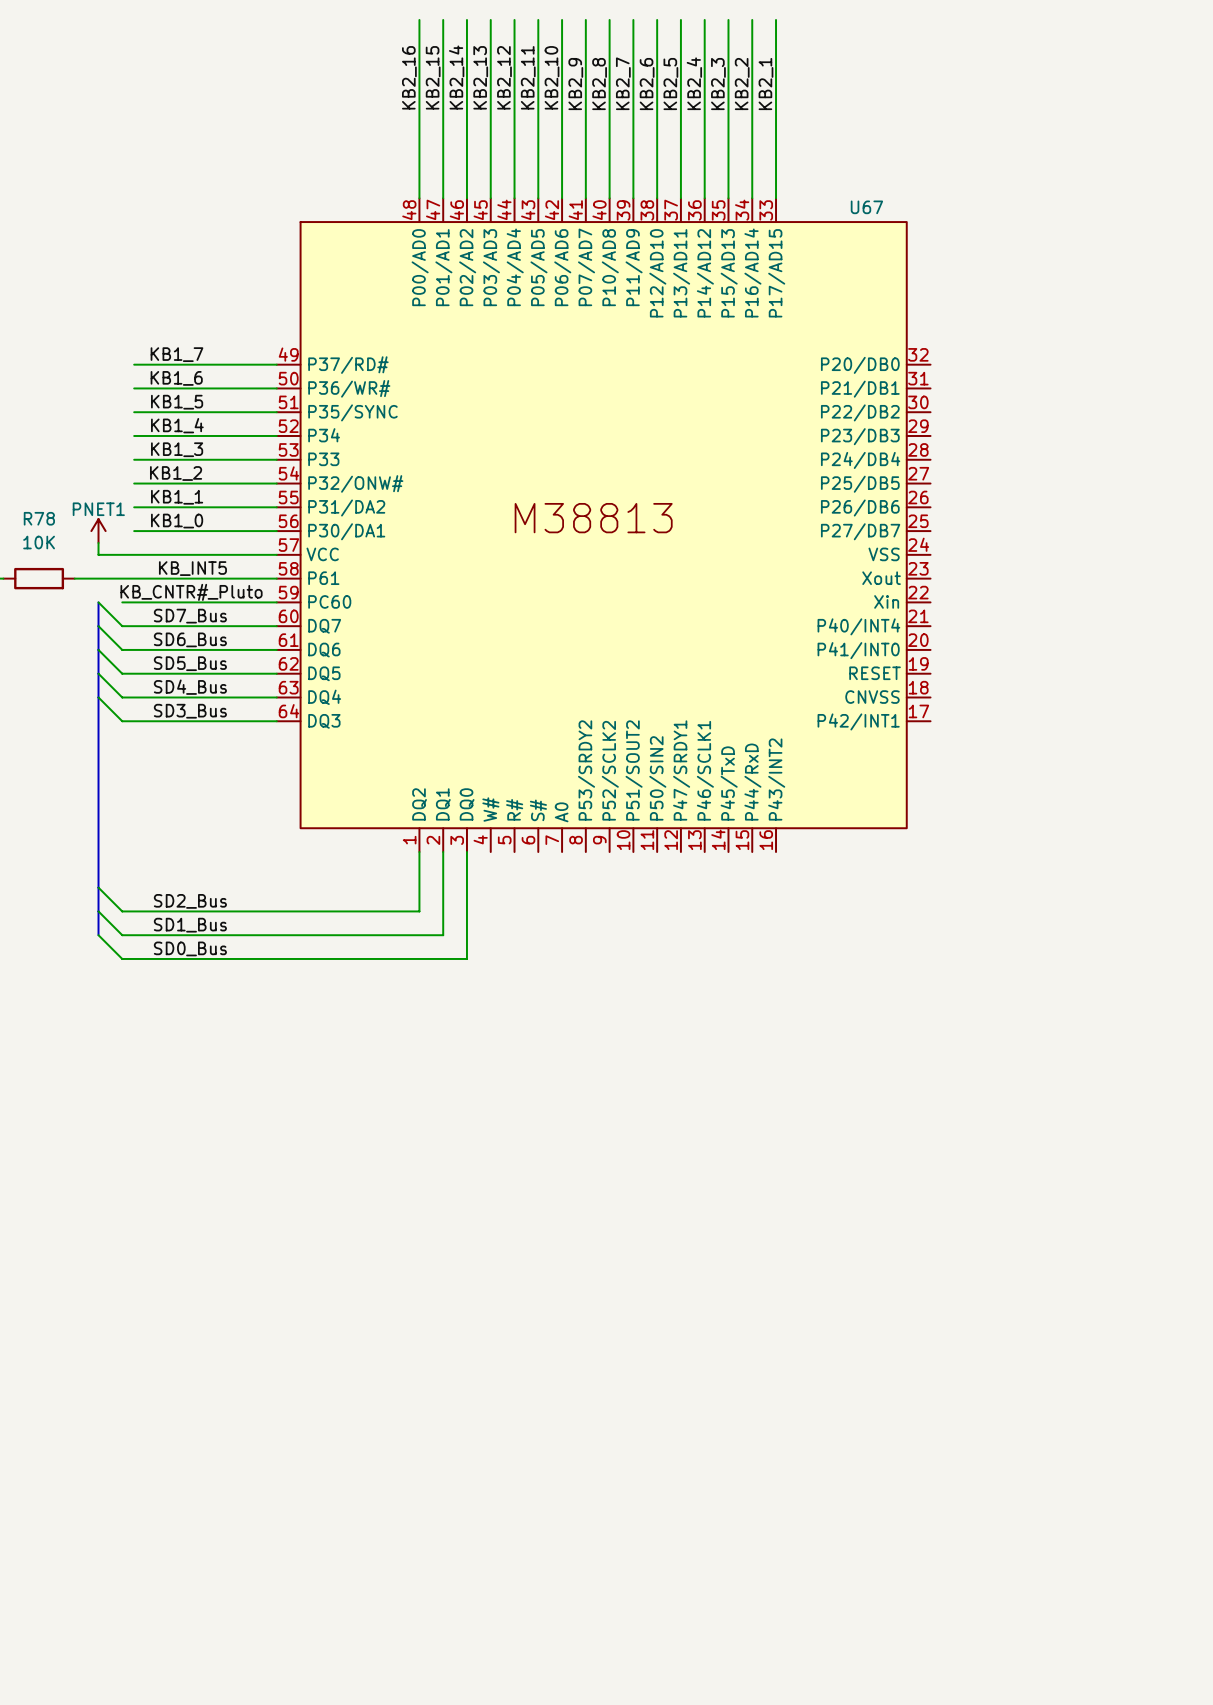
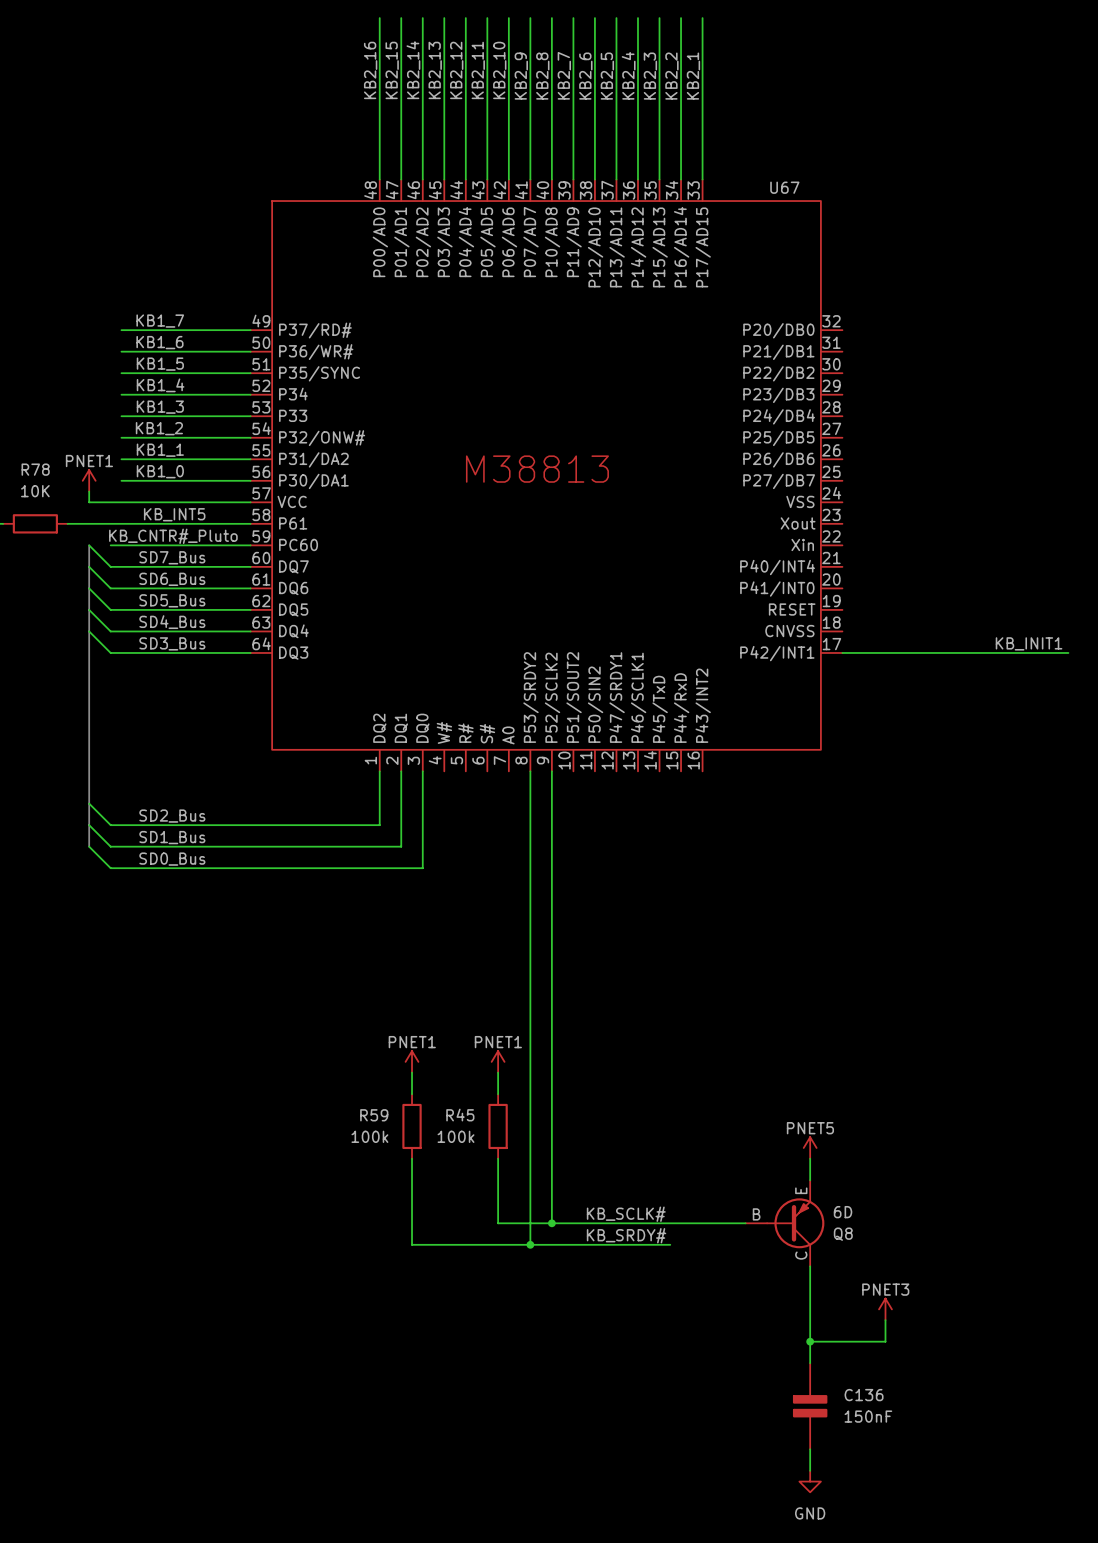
label: none -> KB_INIT1 (1029, 643)
wire: none -> (842, 652) (1068, 652)
wire: none -> (530, 771) (530, 1244)
wire: none -> (551, 771) (551, 1223)
power symbol: none -> PNET1 (412, 1061)
power symbol: none -> PNET1 (498, 1061)
wire: none -> (412, 1072) (412, 1094)
wire: none -> (498, 1072) (498, 1094)
R59: none -> 100k (412, 1126)
R45: none -> 100k (498, 1126)
power symbol: none -> PNET5 (810, 1147)
wire: none -> (412, 1158) (412, 1244) (670, 1244)
wire: none -> (498, 1158) (498, 1223) (745, 1223)
wire: none -> (810, 1158) (810, 1180)
label: none -> KB_SCLK# (626, 1214)
junction: none -> (551, 1223)
Q8: none -> 6D (784, 1223)
label: none -> KB_SRDY# (626, 1235)
junction: none -> (530, 1244)
wire: none -> (810, 1266) (810, 1363)
power symbol: none -> PNET3 (885, 1309)
wire: none -> (885, 1320) (885, 1341) (810, 1341)
junction: none -> (810, 1341)
C136: none -> 150nF (810, 1406)
wire: none -> (810, 1449) (810, 1470)
power symbol: none -> GND (810, 1481)

